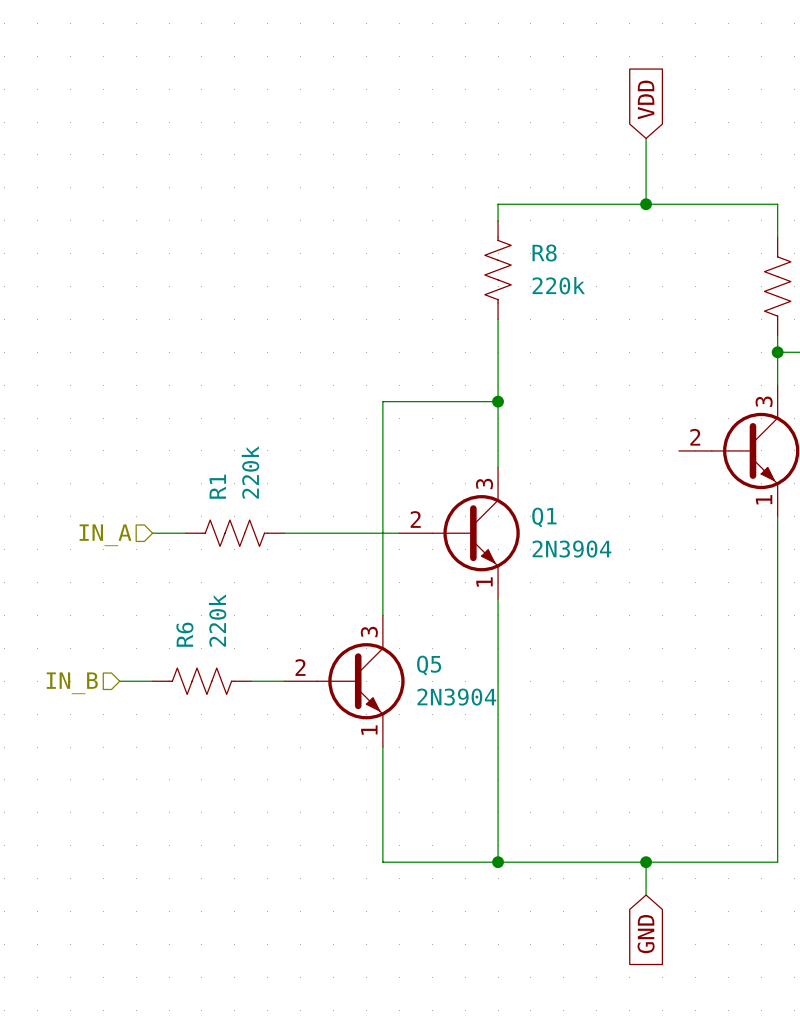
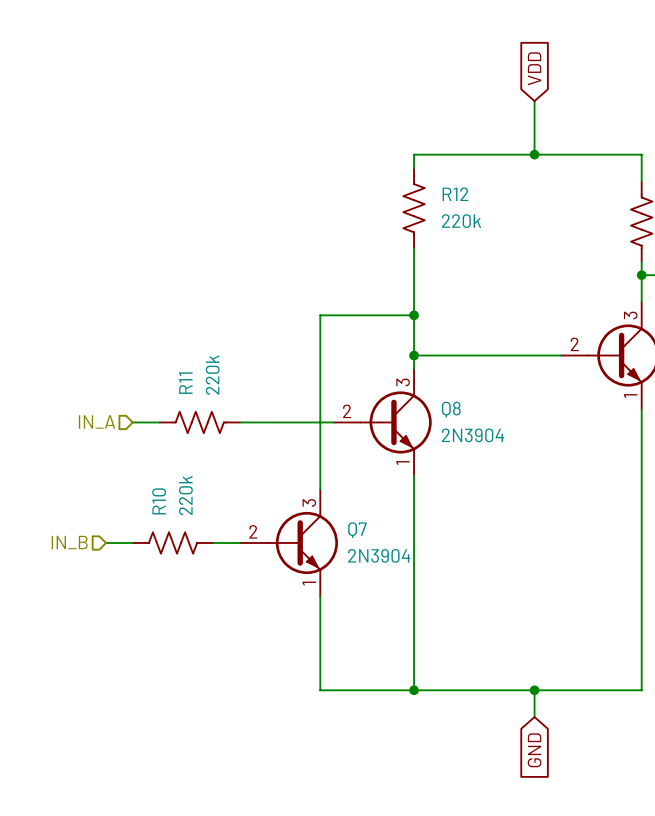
R8 name: R8 (544, 252) -> R12 (455, 194)
wire: none -> (414, 355) (561, 355)
junction: none -> (414, 355)
R1 name: R1 (217, 486) -> R11 (185, 383)
Q1 name: Q1 (544, 517) -> Q8 (451, 409)
R6 name: R6 (184, 634) -> R10 (159, 501)
Q5 name: Q5 (429, 665) -> Q7 (357, 530)

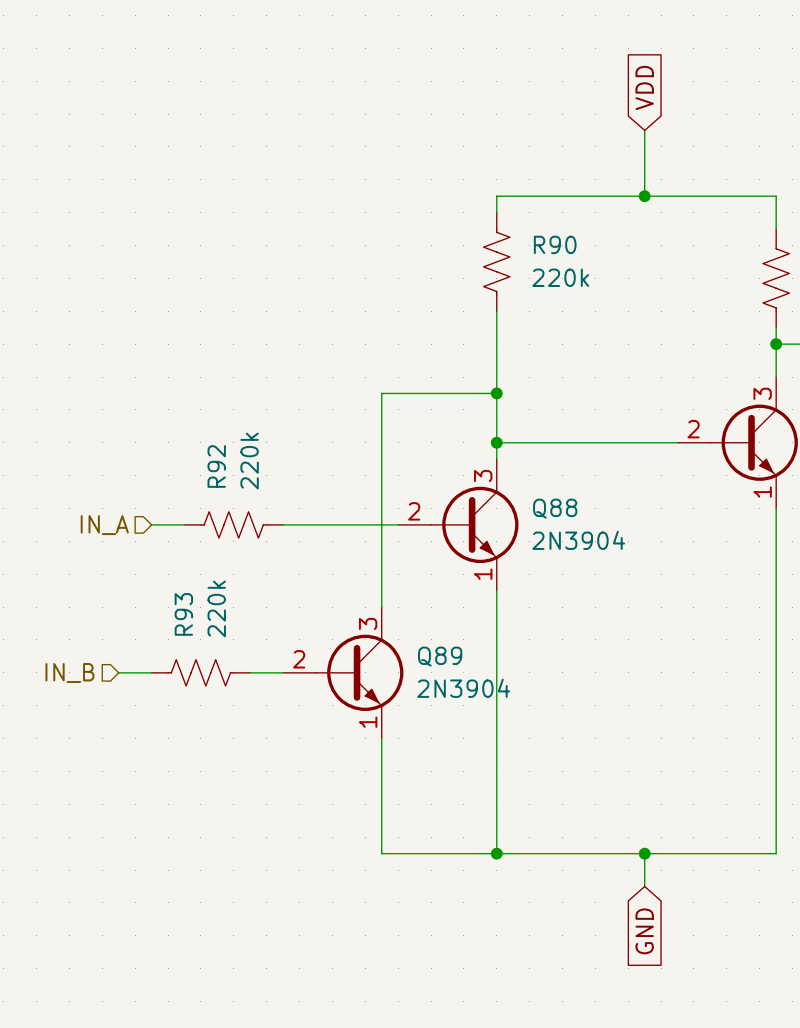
R12 name: R12 (455, 194) -> R90 (555, 244)
R11 name: R11 (185, 383) -> R92 (216, 466)
Q8 name: Q8 (451, 409) -> Q88 (555, 508)
R10 name: R10 (159, 501) -> R93 (183, 614)
Q7 name: Q7 (357, 530) -> Q89 (440, 656)

